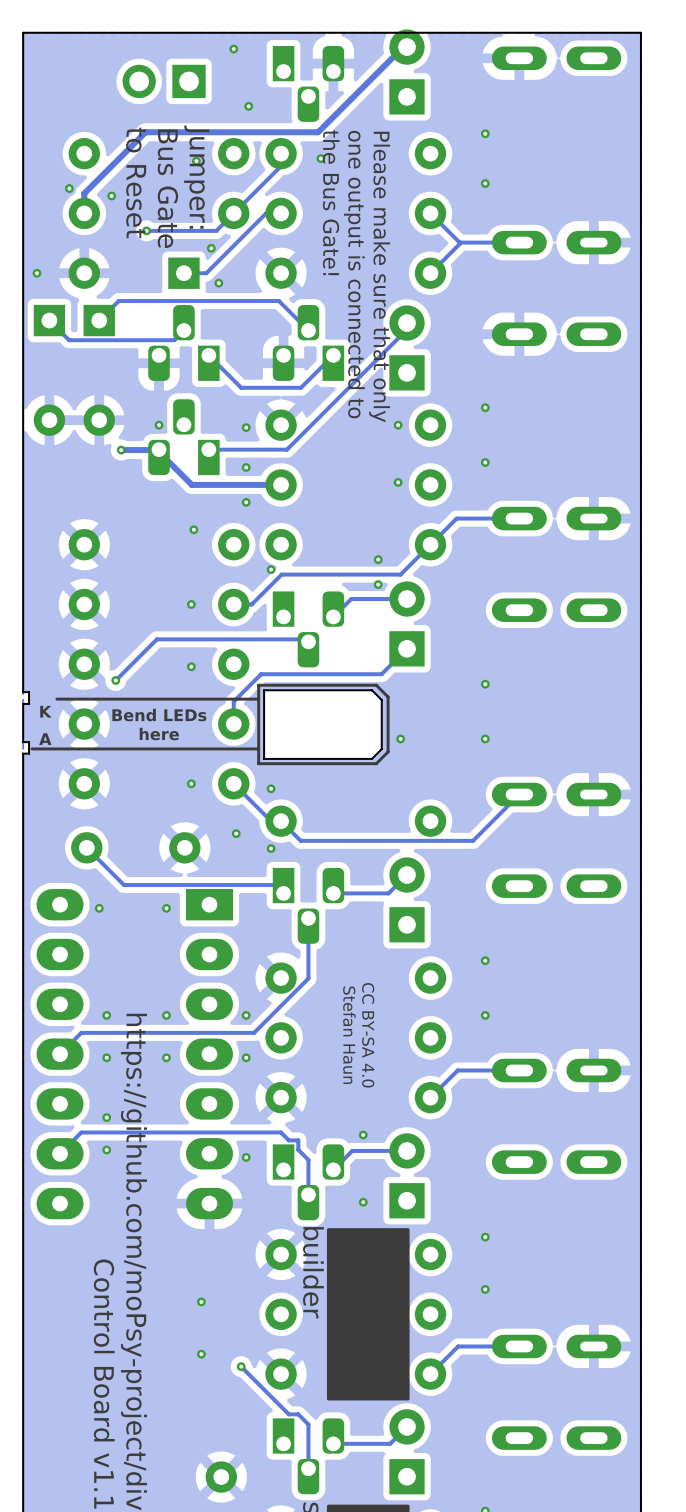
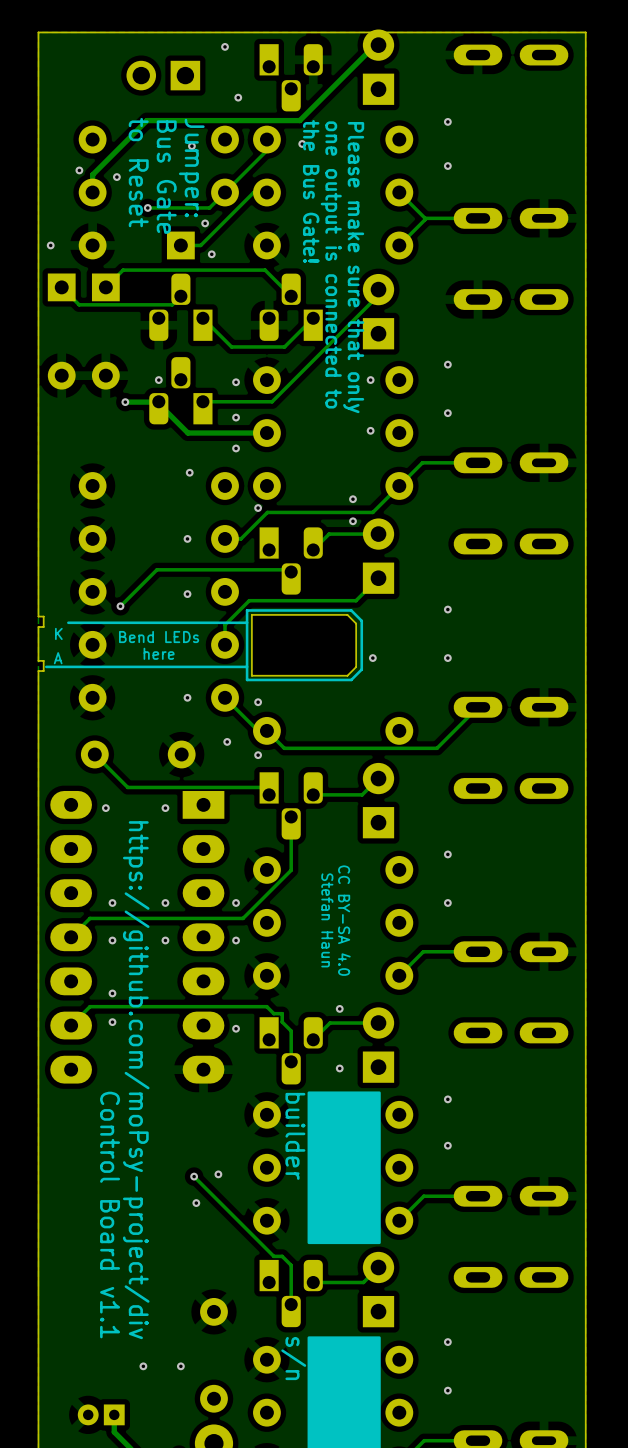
via: (201, 1301) -> none
via: none -> (218, 1174)
track: none -> (194, 1176) (231, 1214)
via: none -> (194, 1176)
via: (241, 1366) -> none

